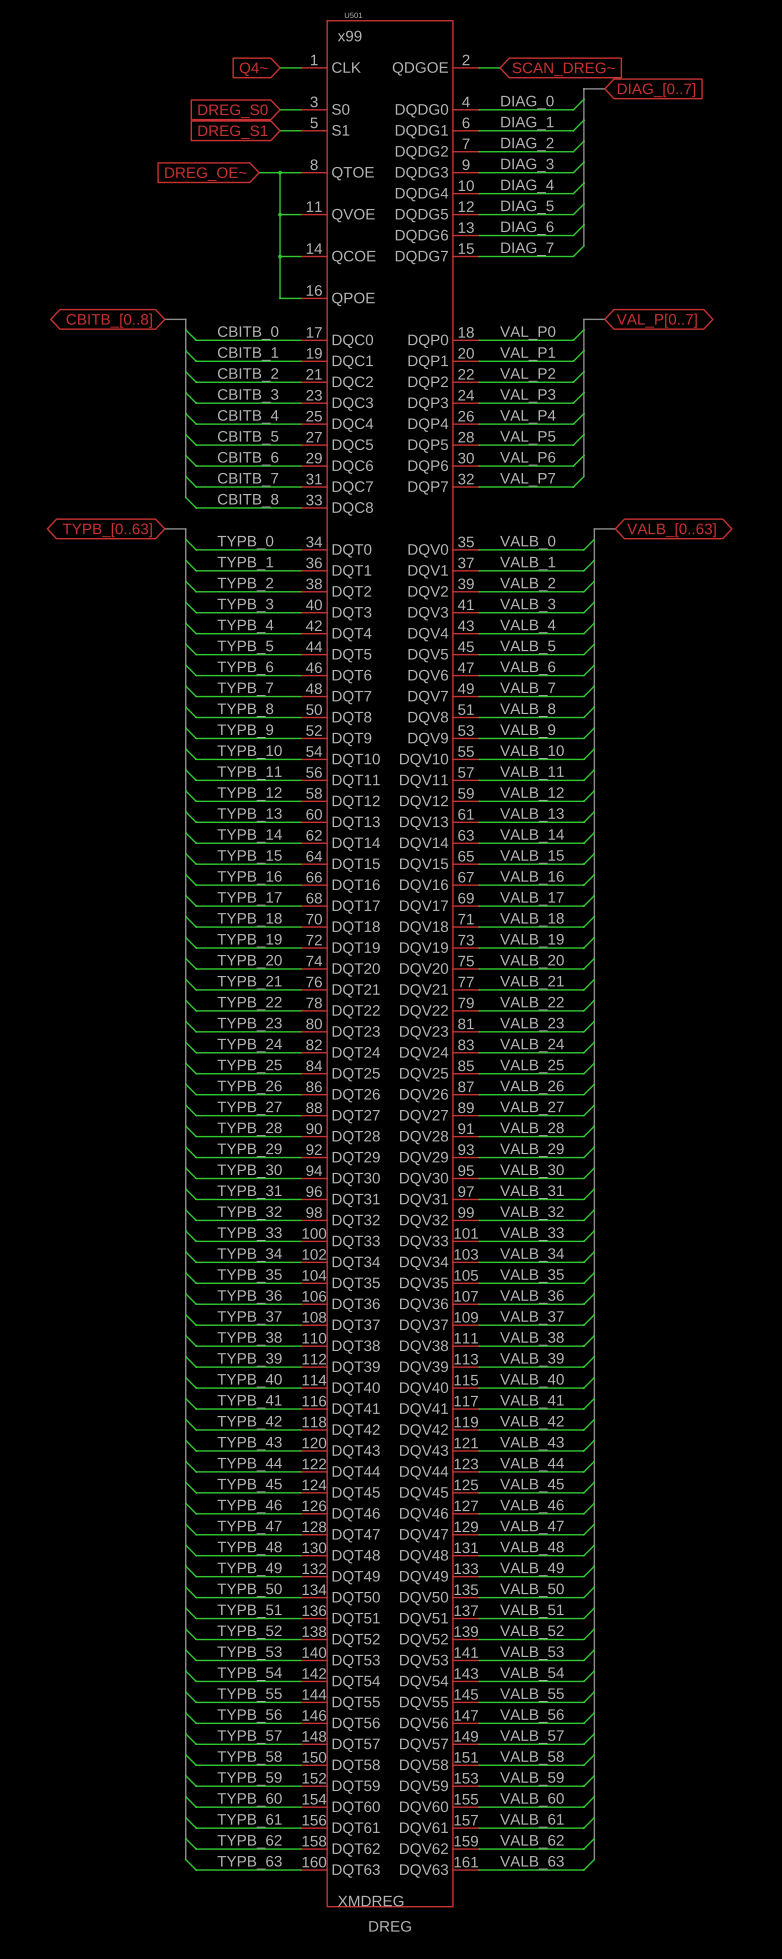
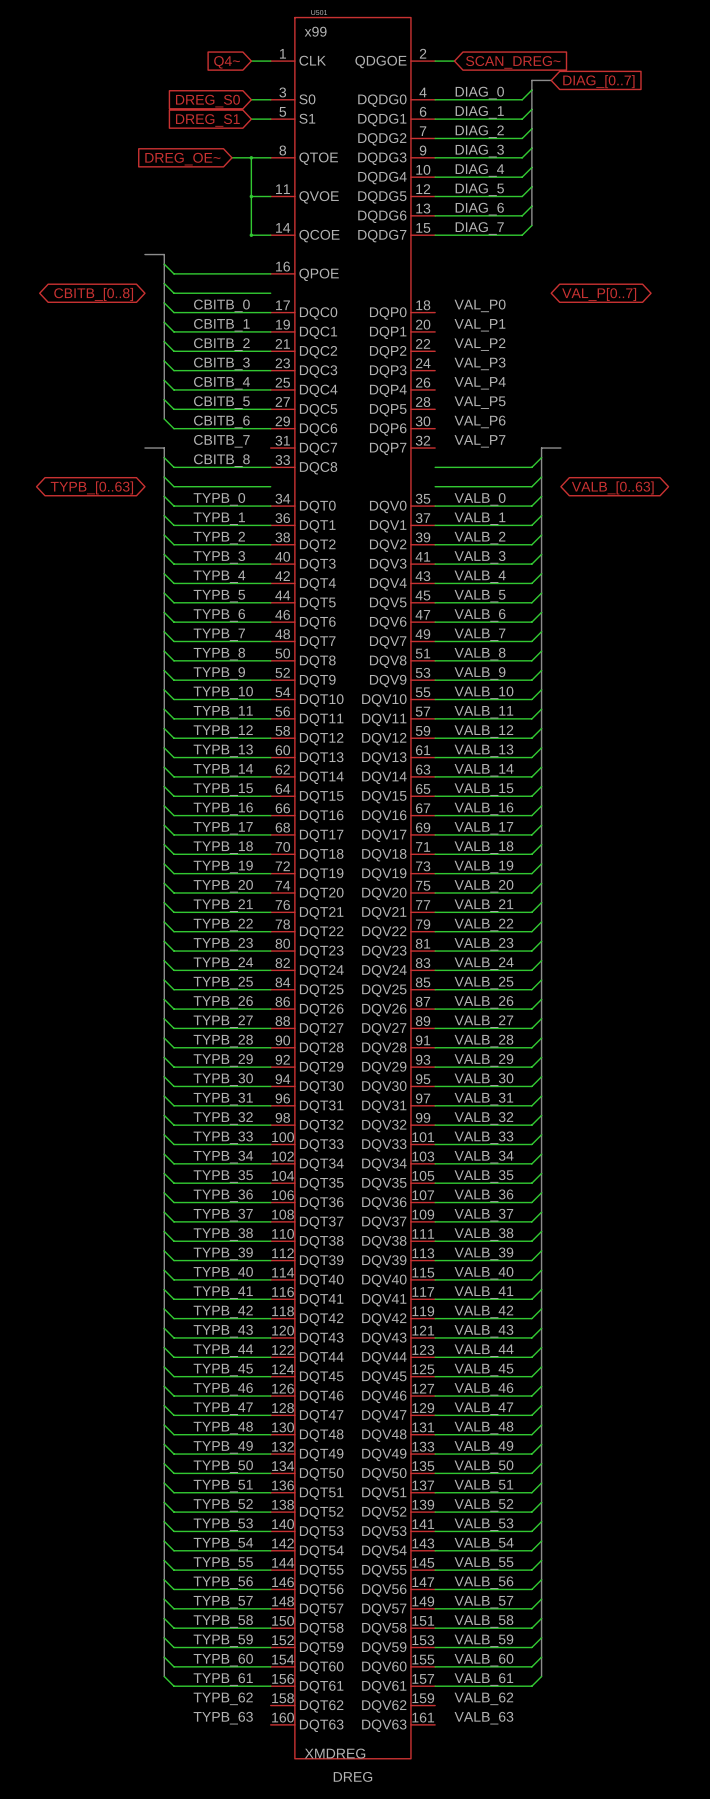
wire: (280, 256) (280, 298) -> (164, 264) (173, 273) (251, 273)
wire: none -> (164, 283) (173, 293) (270, 293)
bus: (164, 319) (185, 319) -> (144, 254) (164, 254) (164, 293)
bus: (604, 319) (583, 319) (583, 476) -> none
wire: (583, 329) (573, 340) (479, 340) -> none
wire: (583, 350) (573, 361) (479, 361) -> none
wire: (583, 371) (573, 382) (479, 382) -> none
wire: (583, 392) (573, 403) (479, 403) -> none
wire: (583, 413) (573, 424) (479, 424) -> none
wire: (583, 434) (573, 445) (479, 445) -> none
bus: (185, 455) (185, 487) -> (144, 448) (164, 448)
wire: (583, 455) (573, 466) (479, 466) -> none
wire: (185, 476) (196, 487) (300, 487) -> (164, 477) (173, 486) (270, 486)
wire: (583, 476) (573, 487) (479, 487) -> none
wire: none -> (541, 457) (531, 467) (435, 467)
wire: none -> (541, 477) (531, 486) (435, 486)
bus: (164, 528) (185, 528) -> (164, 457) (164, 486)
bus: (594, 528) (615, 528) -> (541, 486) (541, 448) (560, 448)
bus: (185, 1817) (185, 1859) -> none
bus: (594, 1817) (594, 1859) -> none
wire: (185, 1838) (196, 1849) (300, 1849) -> none
wire: (594, 1838) (583, 1849) (479, 1849) -> none
wire: (185, 1859) (196, 1870) (300, 1870) -> none
wire: (594, 1859) (583, 1870) (479, 1870) -> none

